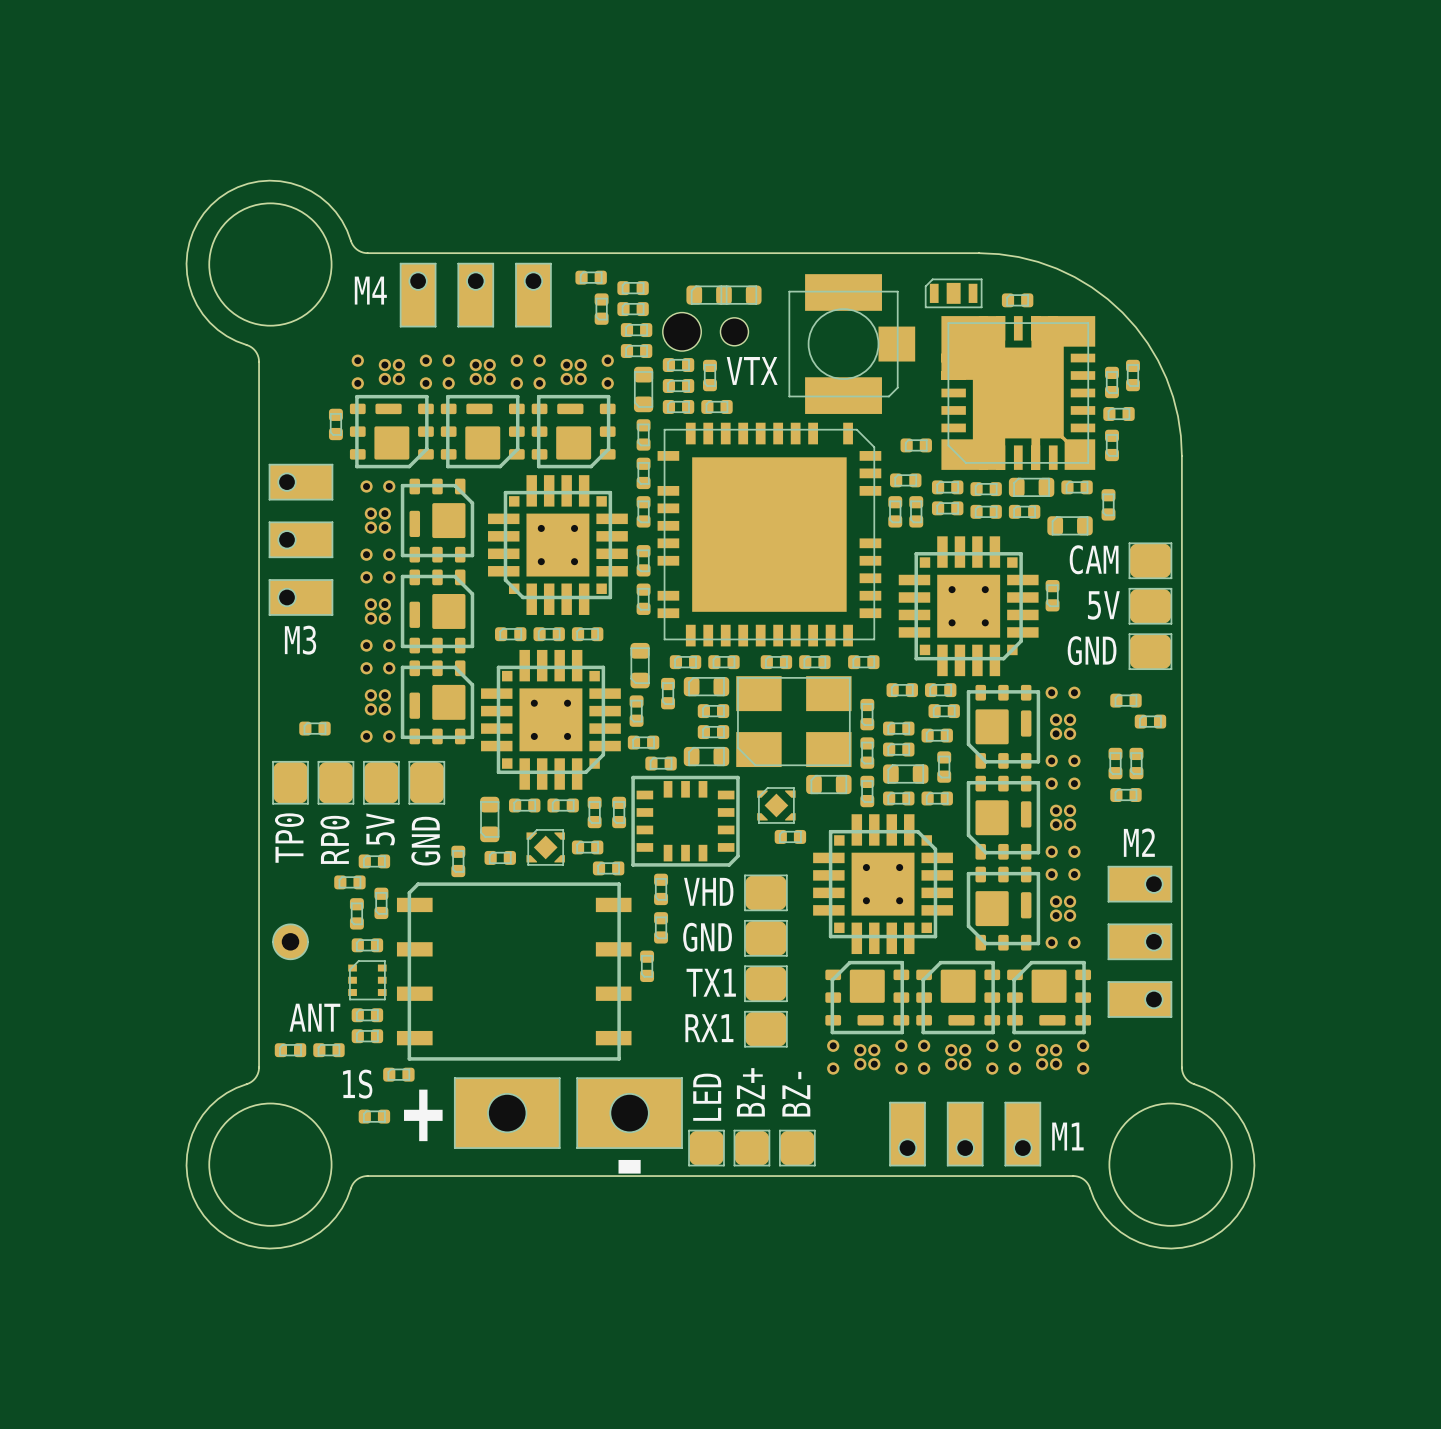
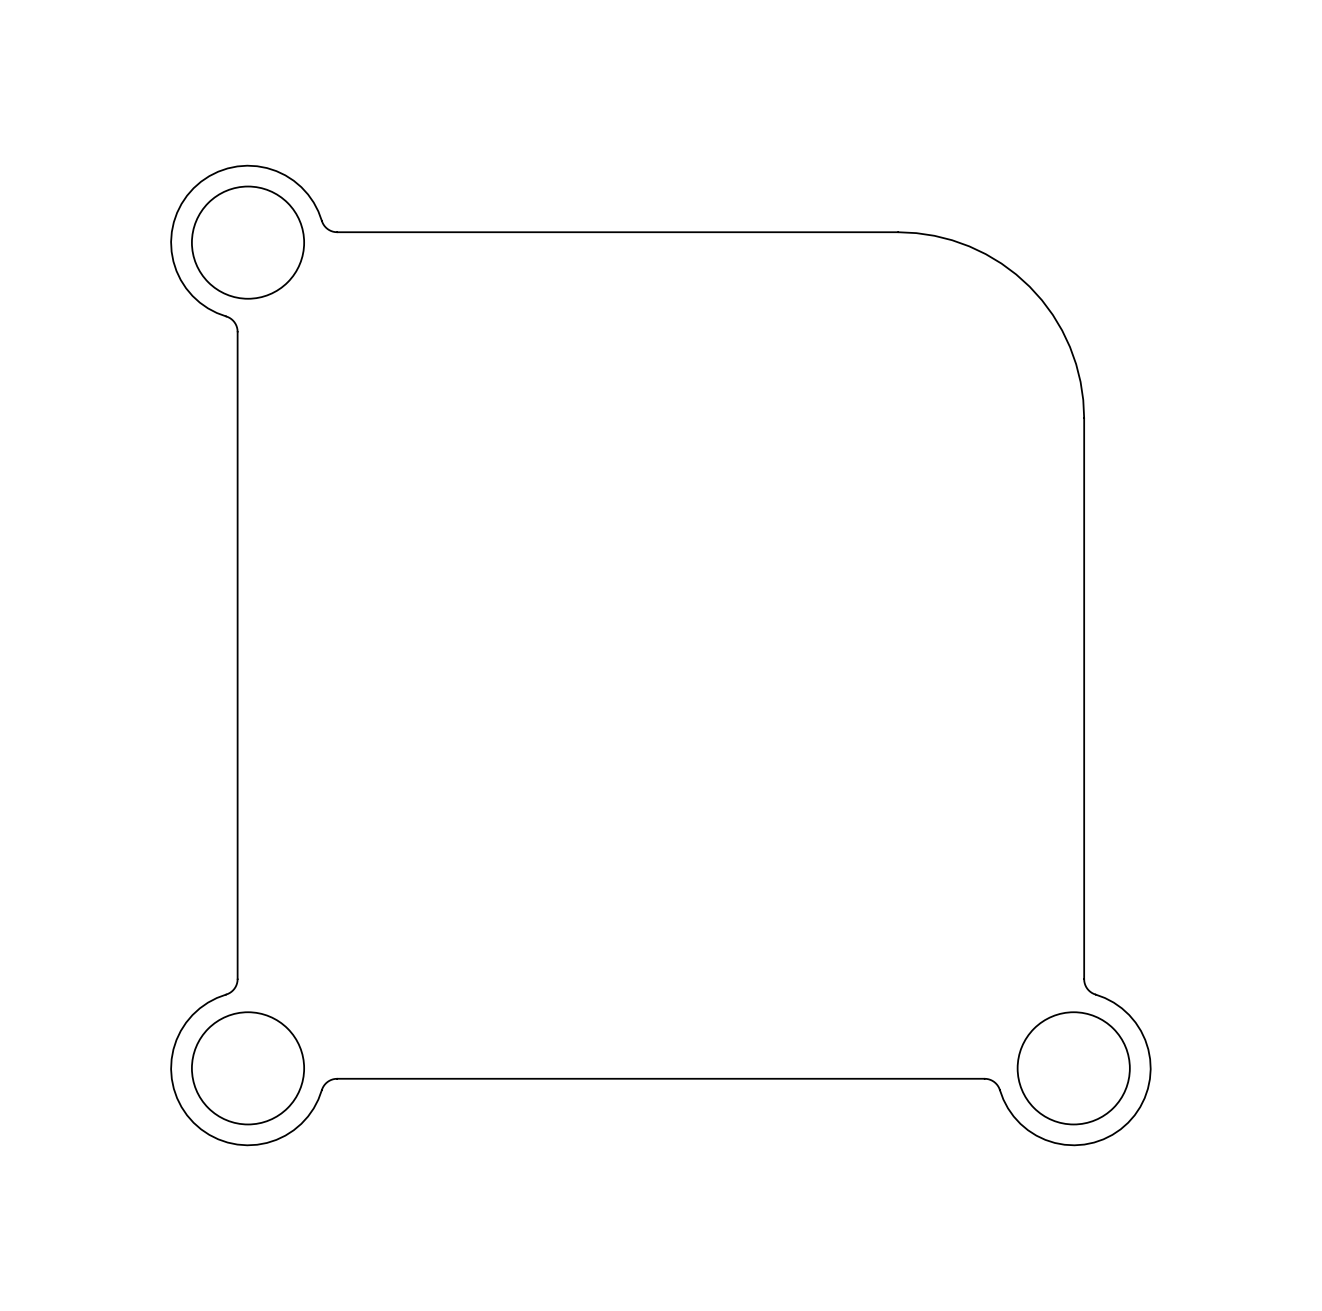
part: (591, 277) -> none
part: (633, 288) -> none
text: M4 (370, 290) -> none
part: (953, 293) -> none
part: (418, 295) -> none
part: (475, 295) -> none
part: (533, 295) -> none
part: (723, 295) -> none
part: (1017, 300) -> none
part: (601, 309) -> none
part: (633, 309) -> none
part: (636, 330) -> none
part: (705, 331) -> none
part: (851, 344) -> none
part: (636, 351) -> none
part: (678, 365) -> none
text: VTX (752, 370) -> none
part: (391, 372) -> none
part: (482, 372) -> none
part: (573, 372) -> none
part: (709, 375) -> none
part: (1132, 375) -> none
part: (1112, 382) -> none
part: (678, 386) -> none
part: (643, 389) -> none
part: (1018, 392) -> none
part: (678, 406) -> none
part: (716, 406) -> none
part: (1118, 413) -> none
part: (335, 424) -> none
part: (391, 431) -> none
part: (482, 431) -> none
part: (573, 431) -> none
part: (643, 434) -> none
part: (916, 445) -> none
part: (1112, 445) -> none
part: (643, 473) -> none
part: (905, 480) -> none
part: (300, 482) -> none
part: (947, 487) -> none
part: (1031, 487) -> none
part: (1077, 487) -> none
part: (986, 489) -> none
part: (1108, 504) -> none
part: (947, 508) -> none
part: (643, 511) -> none
part: (895, 511) -> none
part: (916, 511) -> none
part: (986, 511) -> none
part: (1024, 511) -> none
part: (377, 520) -> none
part: (437, 520) -> none
part: (1070, 525) -> none
part: (769, 534) -> none
part: (300, 539) -> none
part: (557, 545) -> none
text: CAM (1094, 559) -> none
part: (643, 560) -> none
part: (1150, 560) -> none
part: (1052, 595) -> none
part: (300, 597) -> none
part: (643, 599) -> none
text: 5V (1103, 605) -> none
part: (968, 606) -> none
part: (1150, 606) -> none
part: (377, 611) -> none
part: (437, 611) -> none
part: (510, 634) -> none
part: (549, 634) -> none
part: (587, 634) -> none
text: M3 (300, 640) -> none
text: GND (1092, 650) -> none
part: (1150, 651) -> none
part: (685, 662) -> none
part: (723, 662) -> none
part: (776, 662) -> none
part: (814, 662) -> none
part: (863, 662) -> none
part: (640, 665) -> none
part: (706, 686) -> none
part: (902, 690) -> none
part: (940, 690) -> none
part: (668, 693) -> none
part: (1125, 700) -> none
part: (377, 702) -> none
part: (437, 702) -> none
part: (636, 711) -> none
part: (713, 711) -> none
part: (944, 711) -> none
part: (867, 714) -> none
part: (550, 719) -> none
part: (793, 721) -> none
part: (1150, 721) -> none
part: (1003, 726) -> none
part: (1063, 726) -> none
part: (314, 728) -> none
part: (898, 728) -> none
part: (713, 732) -> none
part: (937, 735) -> none
part: (643, 742) -> none
part: (898, 749) -> none
part: (867, 753) -> none
part: (706, 756) -> none
part: (661, 763) -> none
part: (1115, 763) -> none
part: (1136, 763) -> none
part: (944, 767) -> none
part: (905, 774) -> none
part: (290, 782) -> none
part: (335, 782) -> none
part: (381, 782) -> none
part: (426, 782) -> none
part: (828, 784) -> none
part: (867, 791) -> none
part: (1125, 795) -> none
part: (898, 798) -> none
part: (937, 798) -> none
part: (524, 805) -> none
part: (563, 805) -> none
part: (776, 805) -> none
part: (594, 812) -> none
part: (619, 812) -> none
part: (1003, 817) -> none
part: (1063, 817) -> none
part: (489, 819) -> none
part: (685, 821) -> none
text: 5V (380, 829) -> none
part: (790, 836) -> none
text: TP0 (289, 838) -> none
text: RP0 (334, 839) -> none
text: GND (425, 841) -> none
text: M2 (1139, 842) -> none
part: (545, 847) -> none
part: (587, 847) -> none
part: (500, 857) -> none
part: (374, 861) -> none
part: (458, 861) -> none
part: (608, 868) -> none
part: (349, 882) -> none
part: (883, 884) -> none
part: (1139, 884) -> none
part: (661, 889) -> none
text: VHD (708, 891) -> none
part: (765, 892) -> none
part: (381, 903) -> none
part: (1003, 908) -> none
part: (1063, 908) -> none
part: (356, 913) -> none
part: (661, 927) -> none
text: GND (707, 937) -> none
part: (765, 938) -> none
part: (290, 941) -> none
part: (1139, 941) -> none
part: (367, 945) -> none
part: (647, 966) -> none
part: (514, 971) -> none
part: (367, 980) -> none
text: TX1 (711, 982) -> none
part: (765, 983) -> none
part: (867, 997) -> none
part: (958, 997) -> none
part: (1049, 997) -> none
part: (1139, 999) -> none
part: (367, 1015) -> none
text: ANT (314, 1017) -> none
text: RX1 (709, 1028) -> none
part: (765, 1029) -> none
part: (367, 1036) -> none
part: (290, 1050) -> none
part: (328, 1050) -> none
part: (867, 1057) -> none
part: (958, 1057) -> none
part: (1049, 1057) -> none
part: (398, 1074) -> none
text: 1S (357, 1084) -> none
text: BZ+ (750, 1092) -> none
text: BZ- (796, 1094) -> none
text: LED (707, 1097) -> none
part: (507, 1113) -> none
part: (629, 1113) -> none
text: + (423, 1115) -> none
part: (374, 1116) -> none
part: (907, 1134) -> none
part: (965, 1134) -> none
part: (1022, 1134) -> none
text: M1 (1067, 1136) -> none
part: (706, 1148) -> none
part: (751, 1148) -> none
part: (797, 1148) -> none
text: - (629, 1166) -> none

